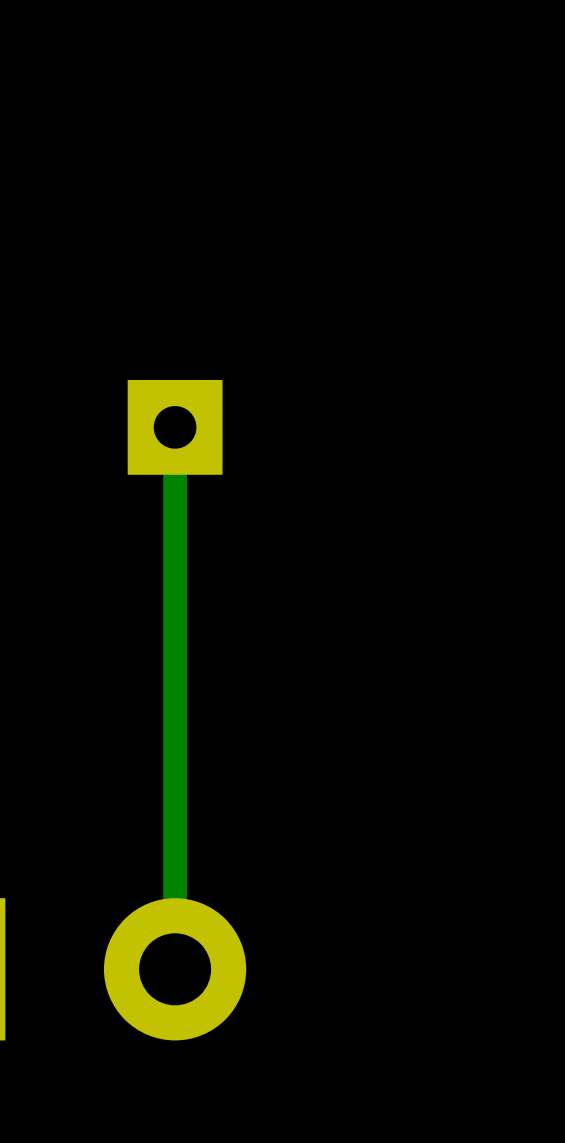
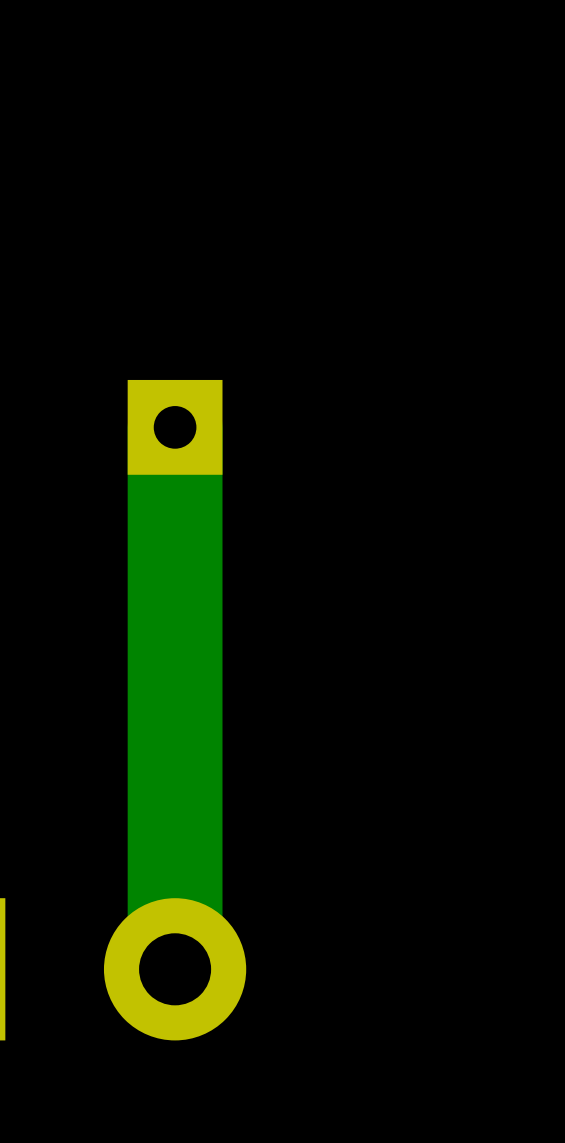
track width: thin (175, 427) (175, 969) -> thick (175, 427) (175, 969)

